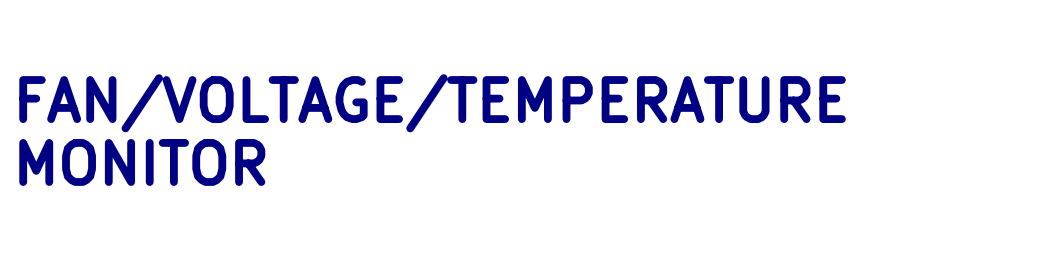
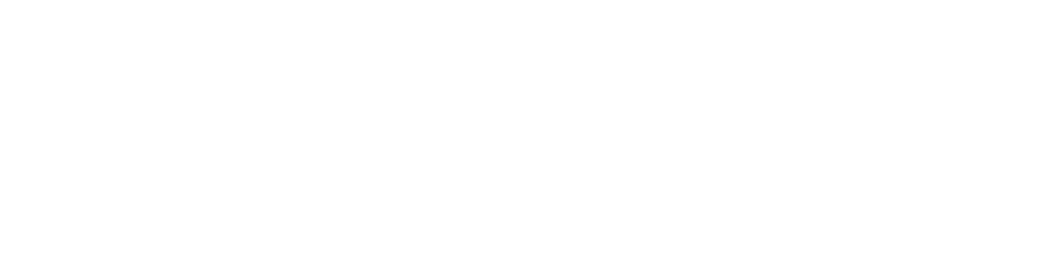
text: FAN/VOLTAGE/TEMPERATURE (432, 103) -> none
text: MONITOR (142, 162) -> none

